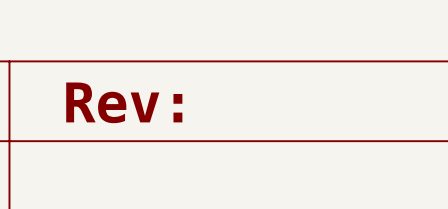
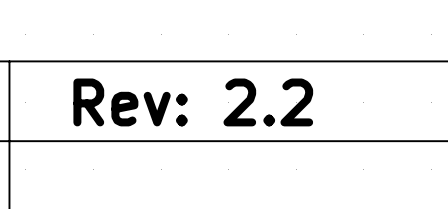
title block: Rev: (124, 102) -> Rev: 2.2 (193, 102)

